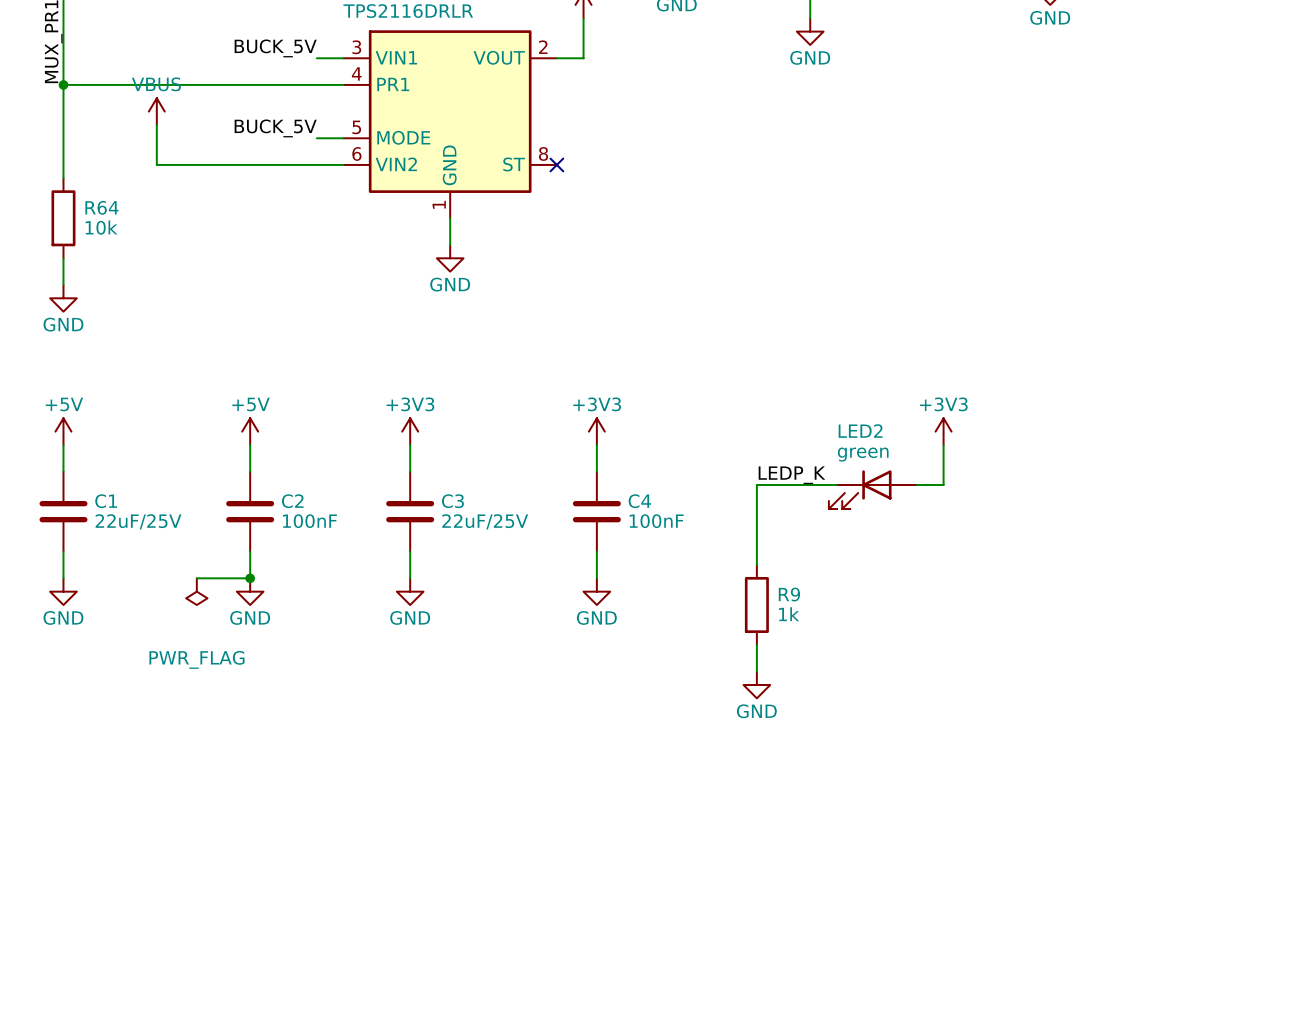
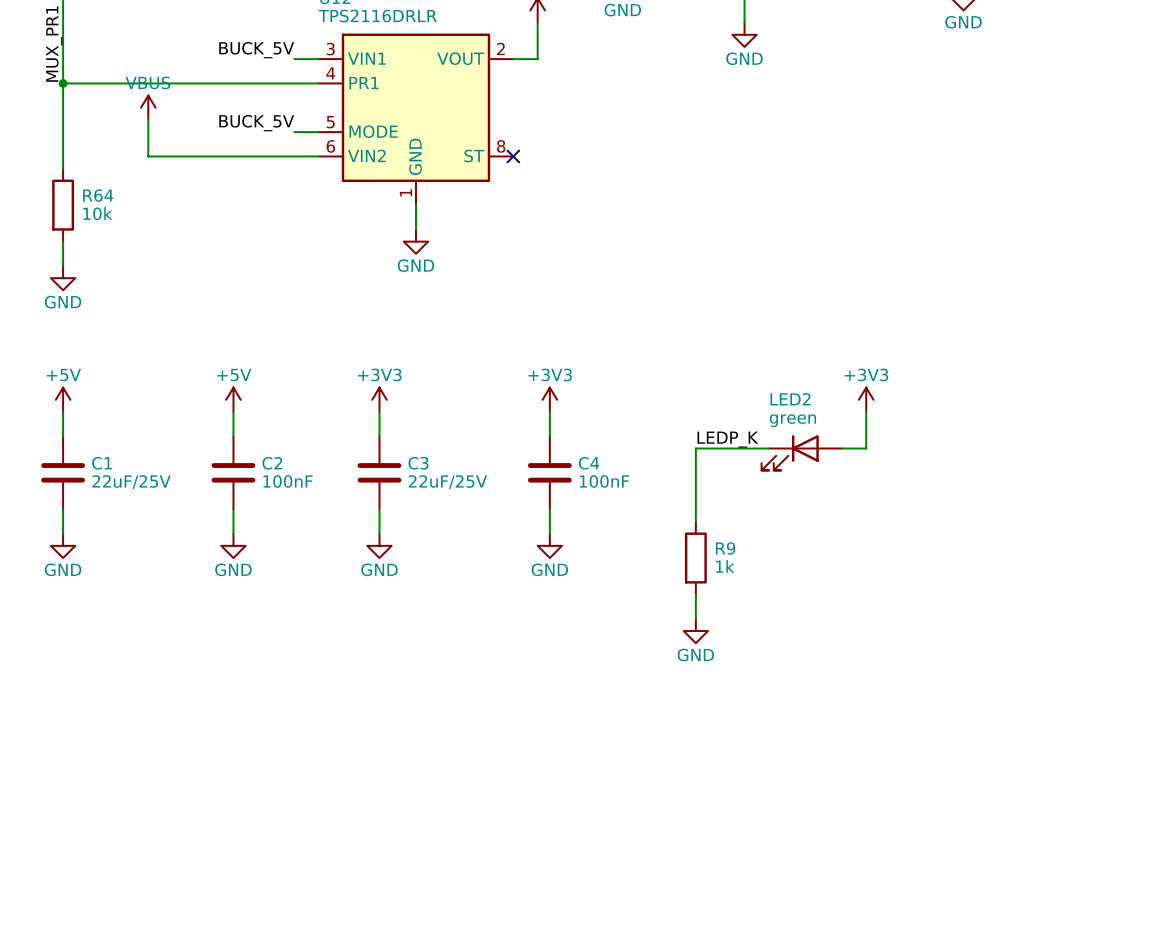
wire: (196, 578) (250, 578) -> none
junction: (250, 578) -> none
power symbol: PWR_FLAG (196, 591) -> none

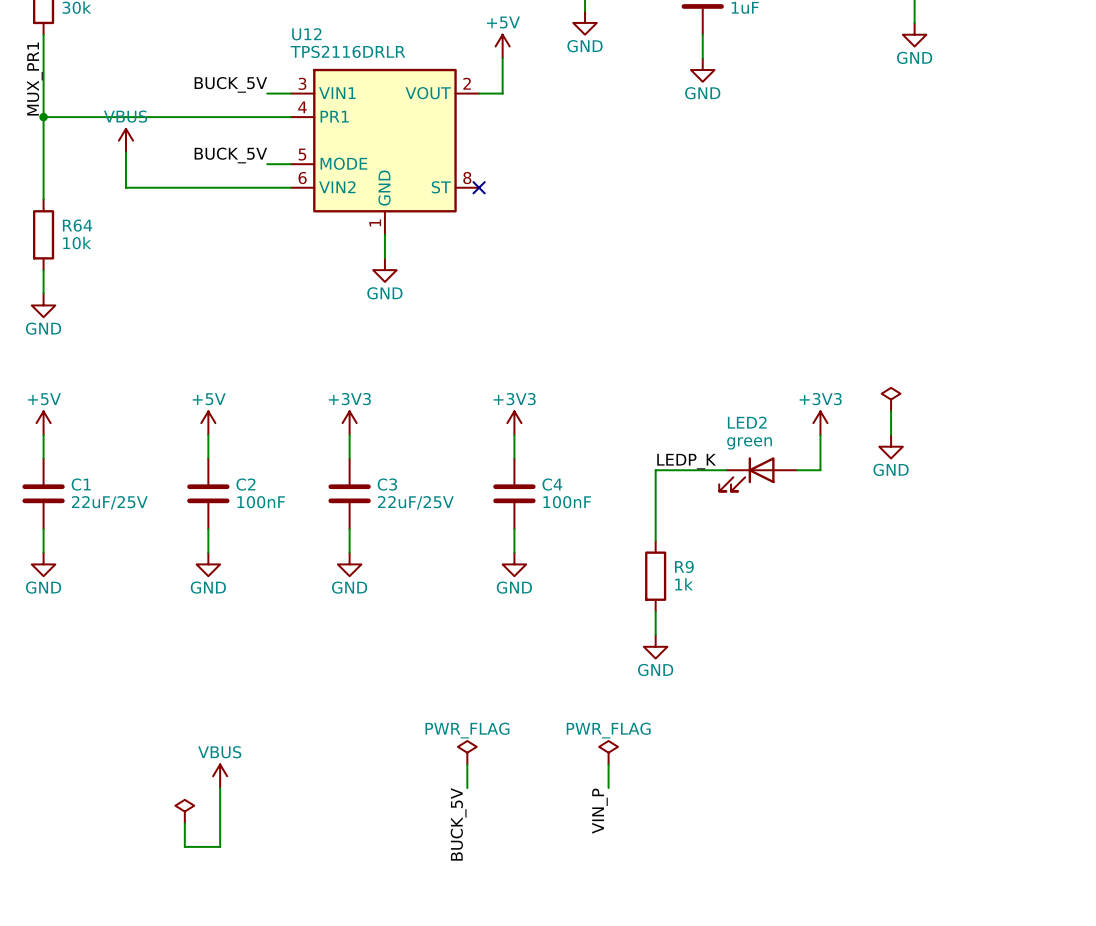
power symbol: none -> (891, 399)
wire: none -> (891, 411) (891, 434)
power symbol: none -> GND (891, 446)
power symbol: none -> PWR_FLAG (467, 752)
power symbol: none -> PWR_FLAG (608, 752)
wire: none -> (467, 764) (467, 788)
wire: none -> (608, 764) (608, 788)
power symbol: none -> VBUS (220, 776)
wire: none -> (220, 788) (220, 846) (184, 846) (184, 823)
label: none -> VIN_P (599, 811)
power symbol: none -> (184, 811)
label: none -> BUCK_5V (458, 824)

